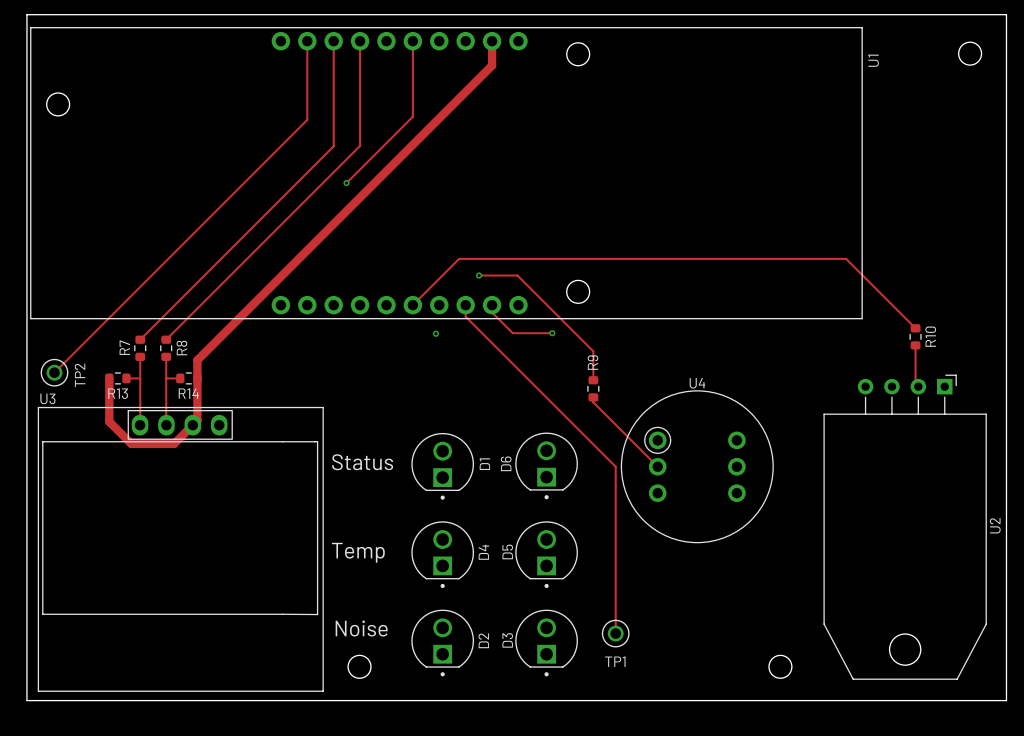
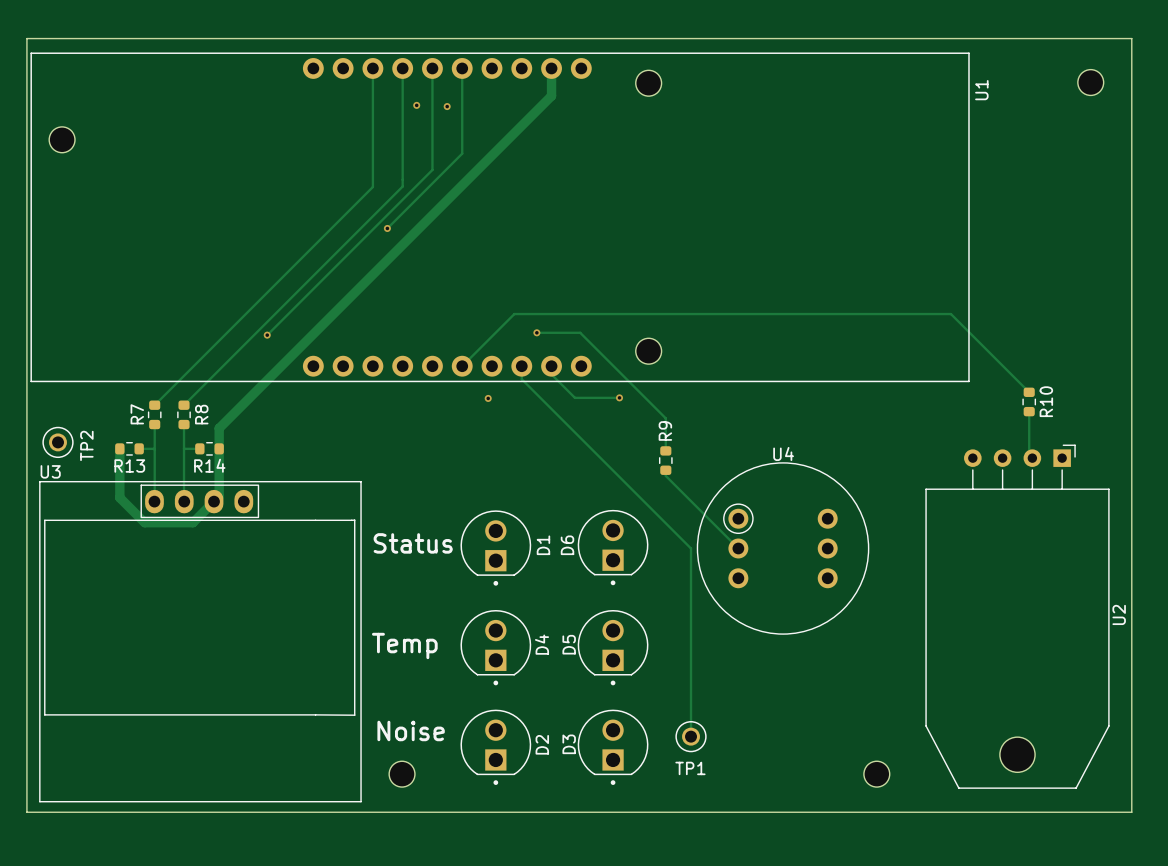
track: (307, 41) (307, 119) (54, 372) -> none
track: none -> (432, 68) (432, 169) (267, 335)
via: none -> (416, 105)
via: none -> (447, 106)
via: none -> (267, 335)

